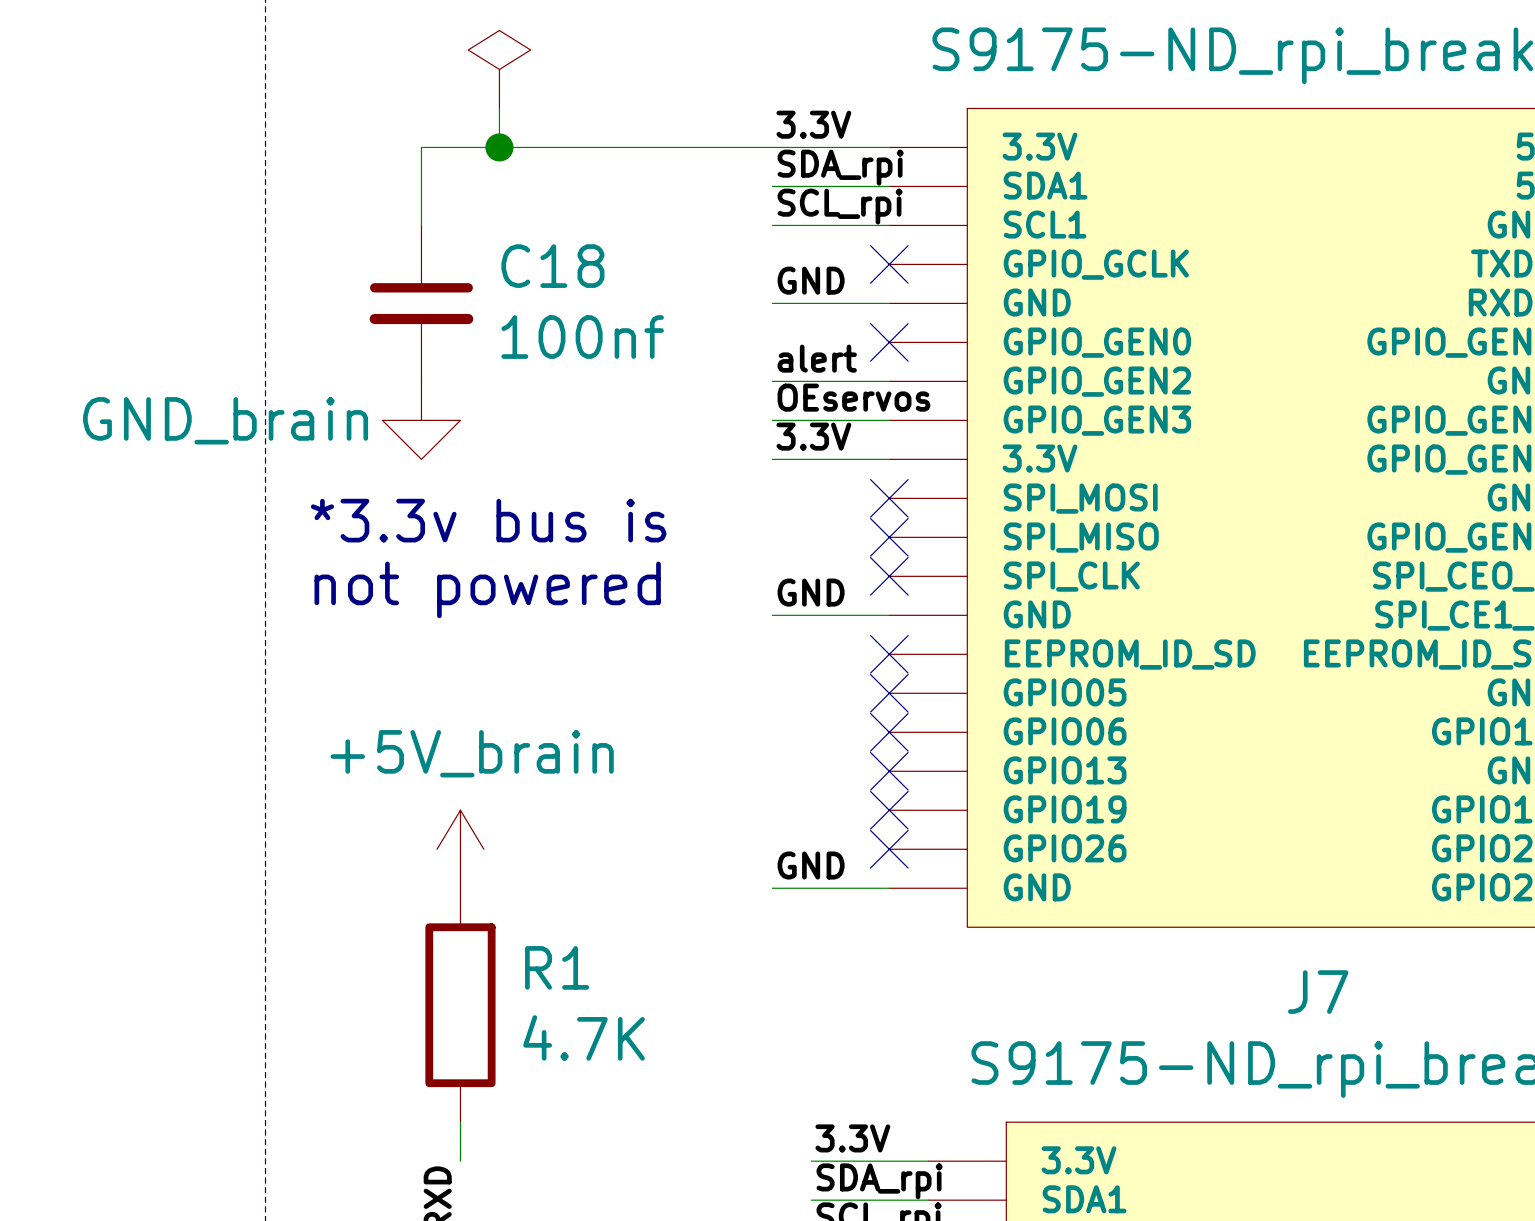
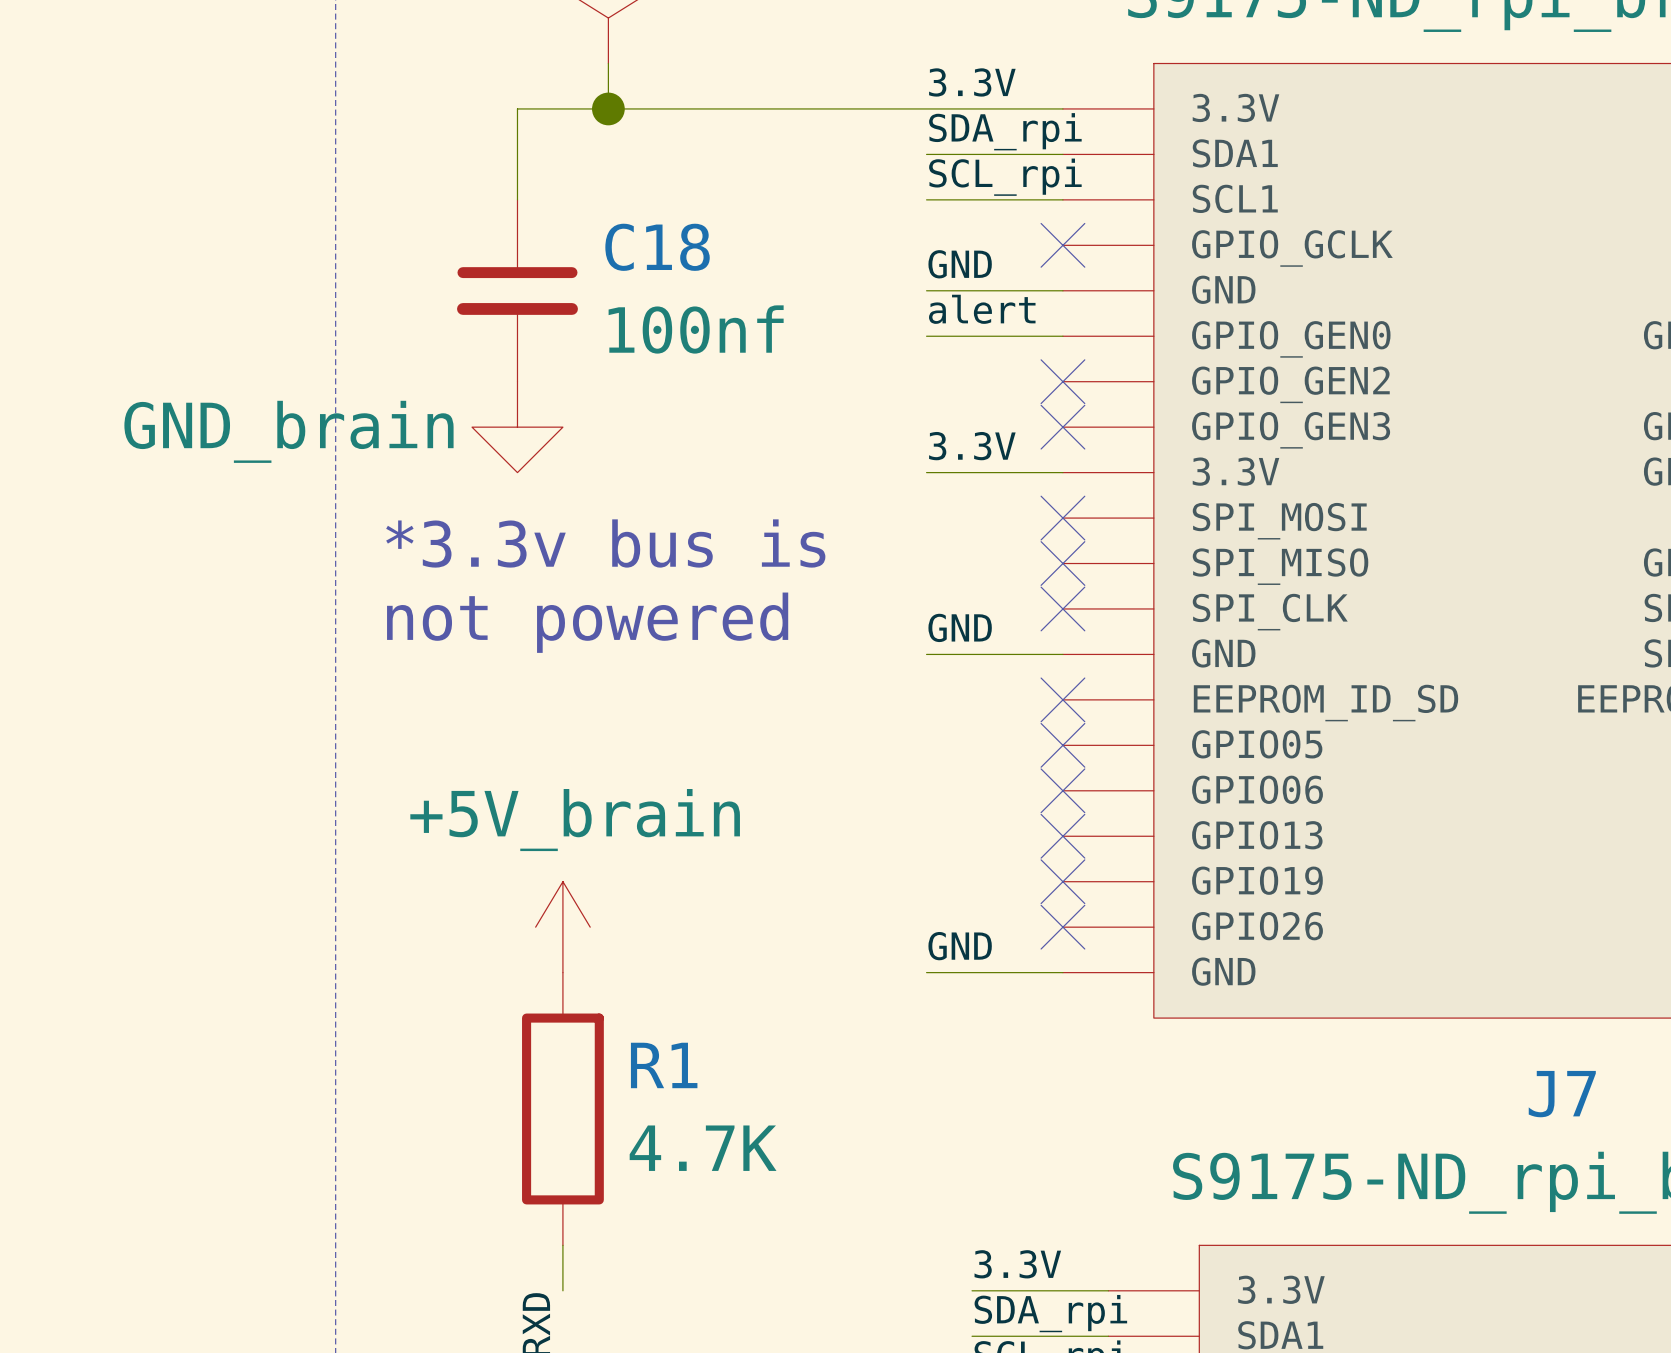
no-connect mark: (889, 342) -> none
label position: alert (817, 358) -> alert (982, 309)
wire: (772, 381) (889, 381) -> (926, 336) (1062, 336)
no-connect mark: none -> (1062, 381)
label: OEservos (853, 397) -> none
wire: (772, 420) (889, 420) -> none
no-connect mark: none -> (1062, 427)

